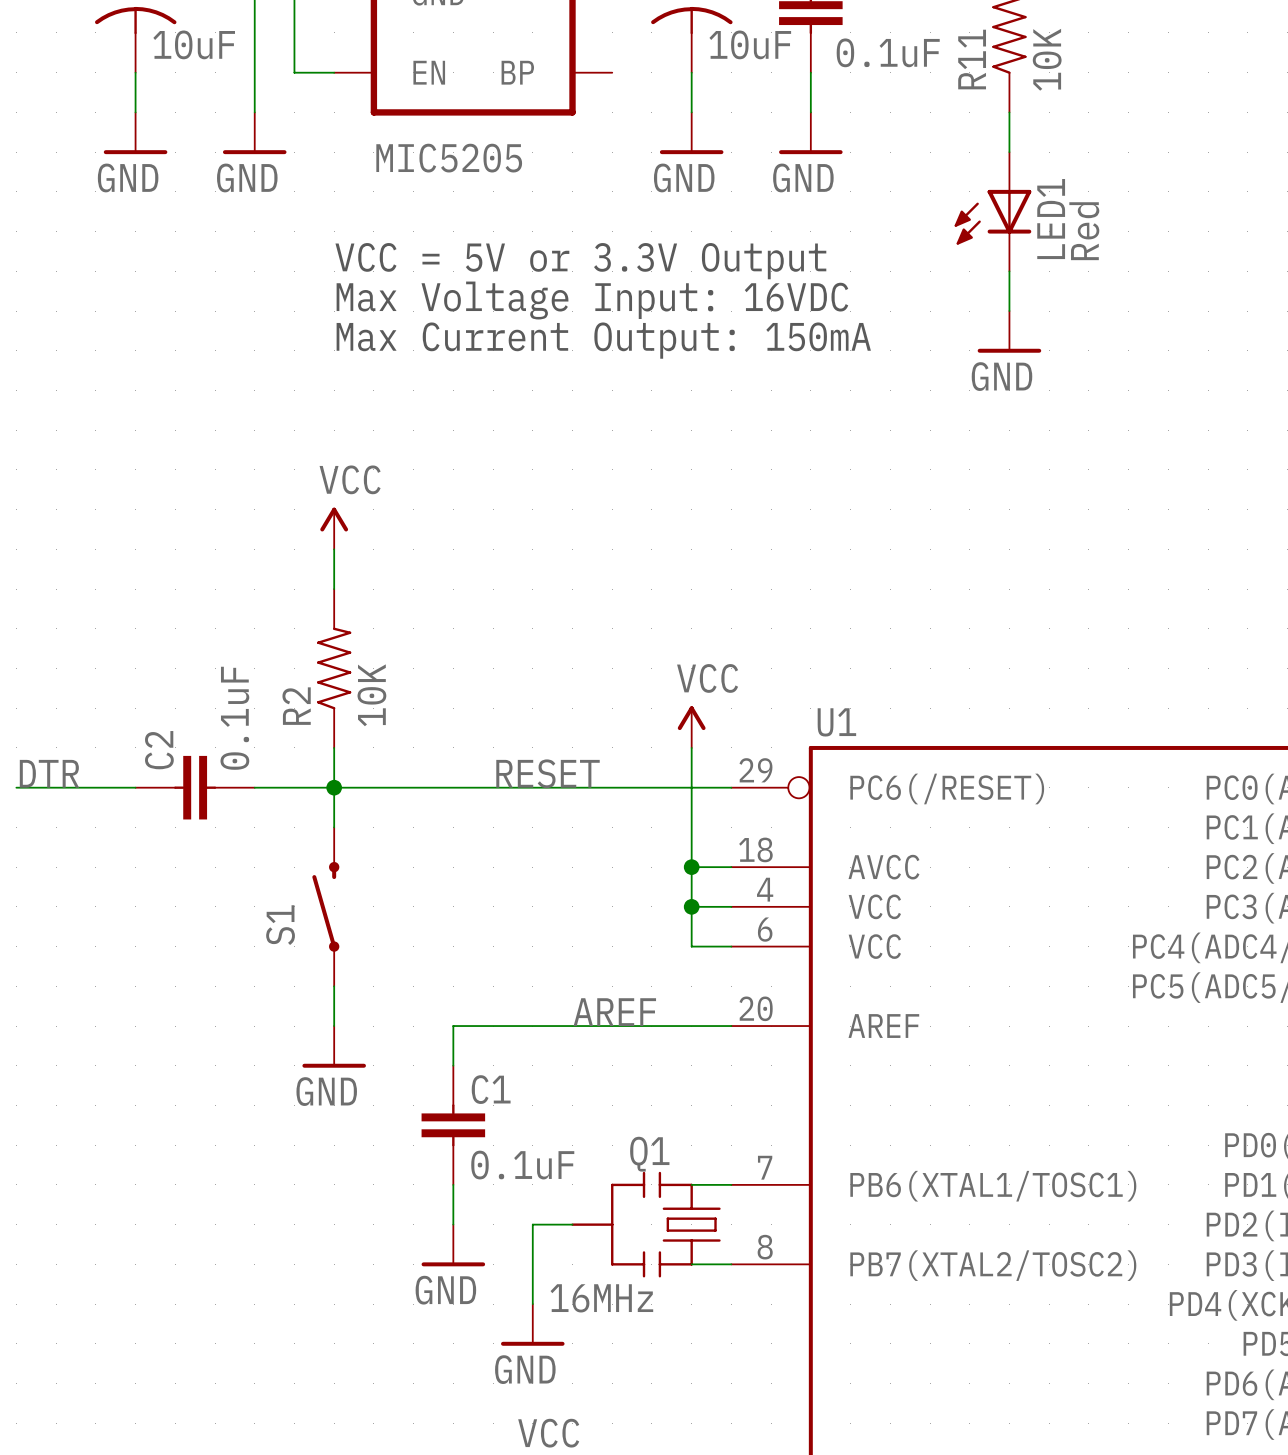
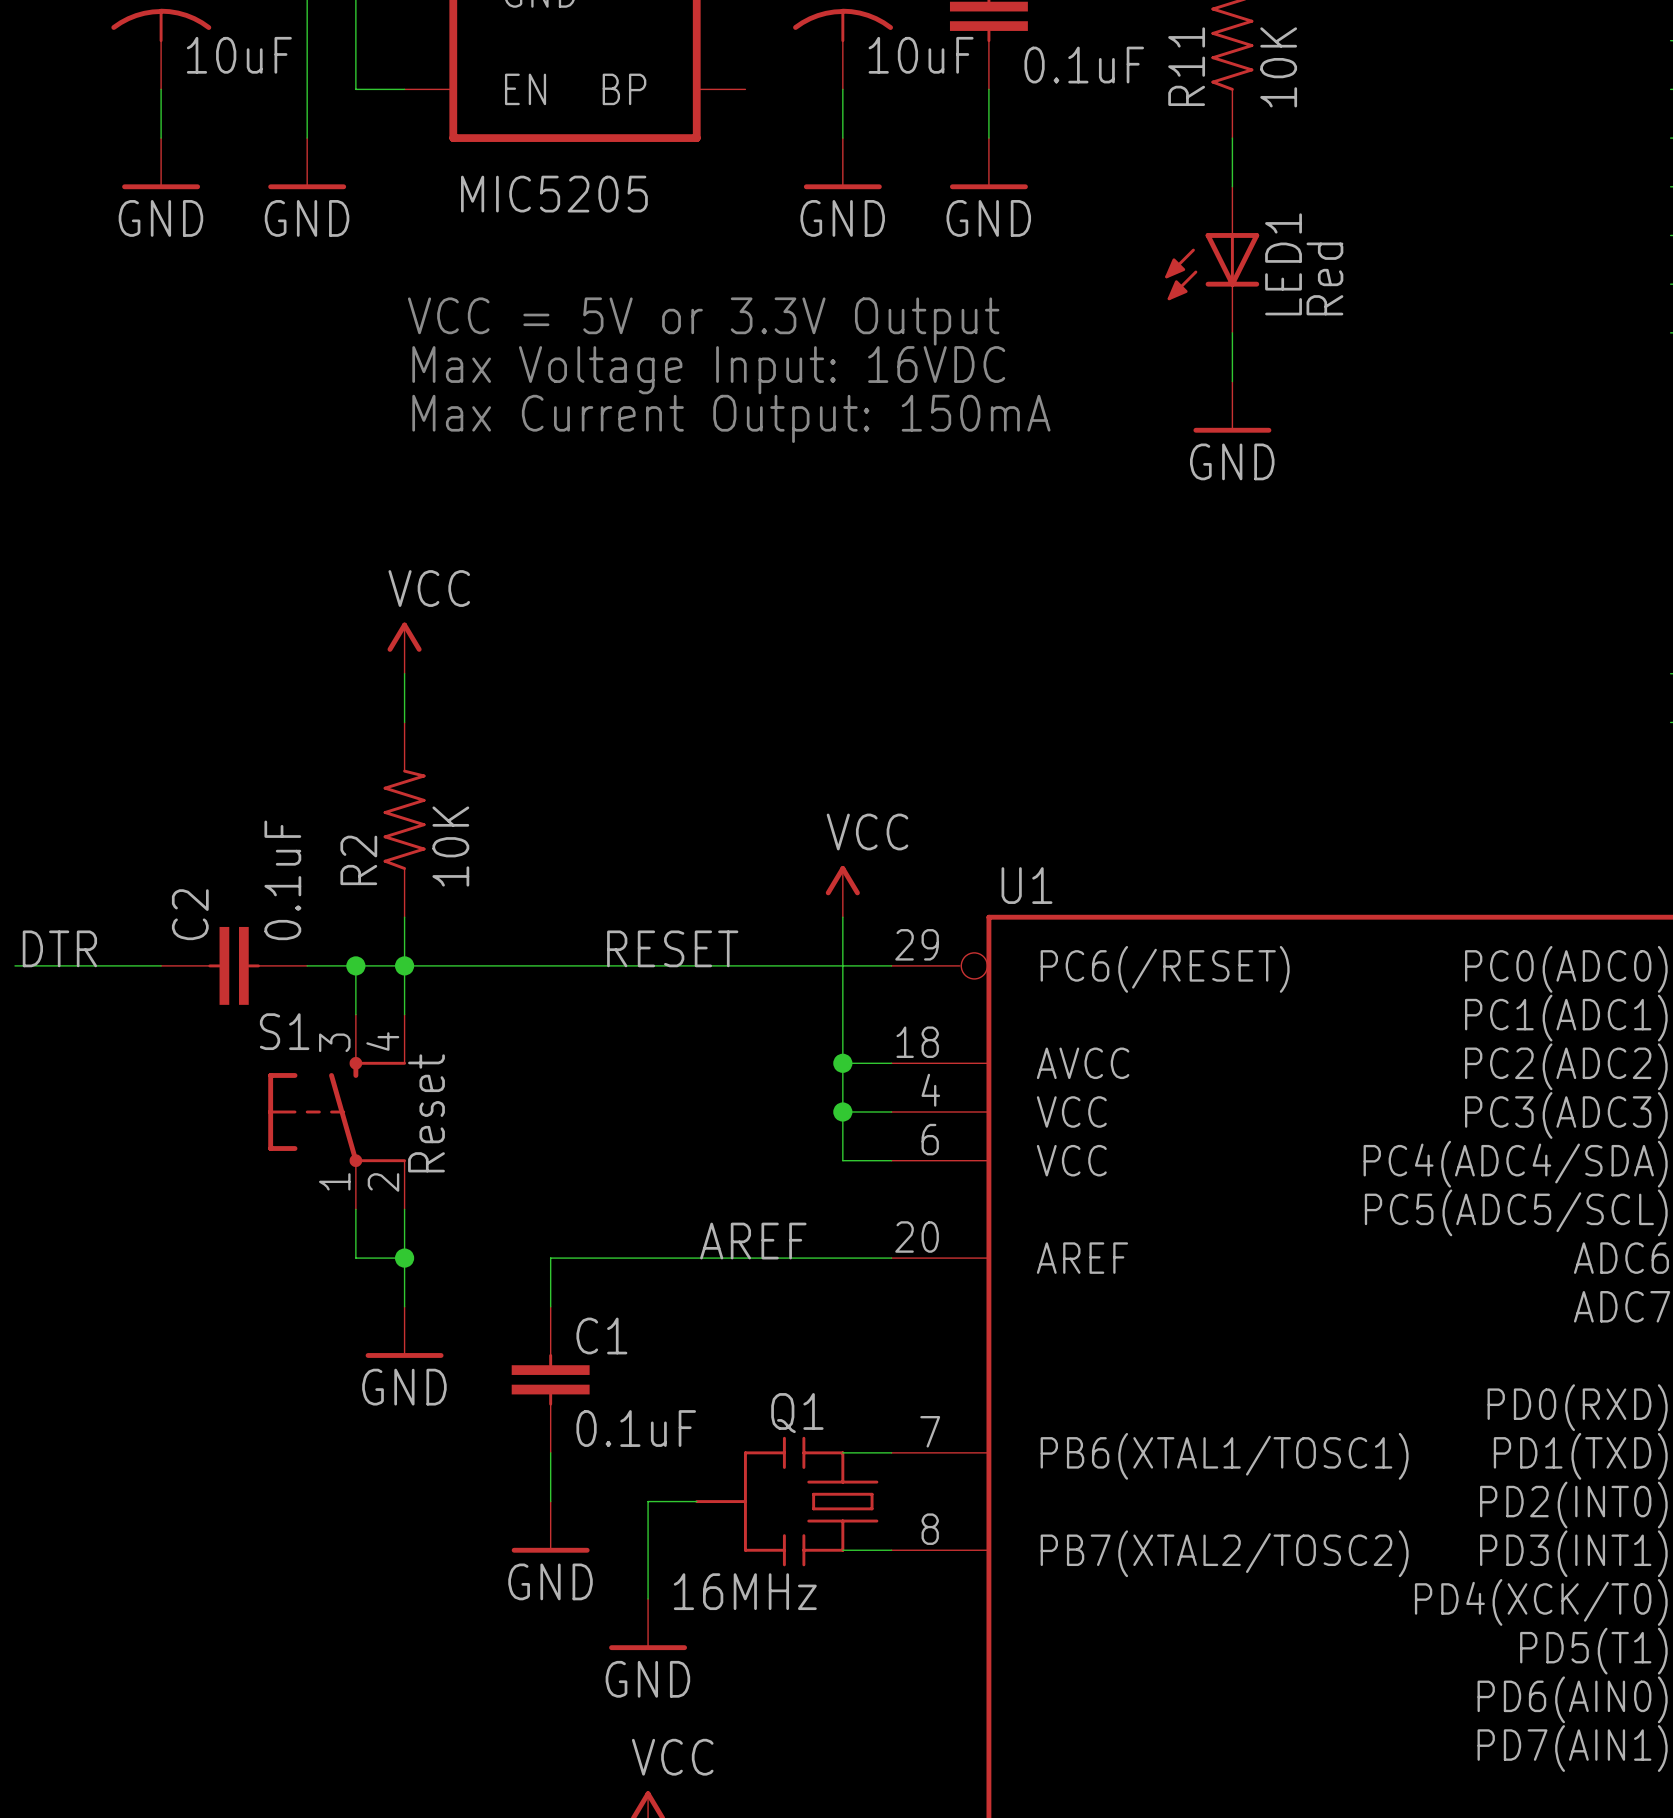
wire: none -> (355, 965) (355, 1014)
junction: none -> (355, 965)
S1 symbol: [312, 827, 340, 987] -> [268, 1014, 407, 1210]
S1 value: none -> Reset (426, 1113)
S1 name position: S1 (280, 925) -> S1 (284, 1031)
wire: none -> (355, 1209) (355, 1258) (404, 1258) (404, 1306)
junction: none -> (404, 1258)
power symbol position: GND (334, 1046) -> GND (404, 1332)

